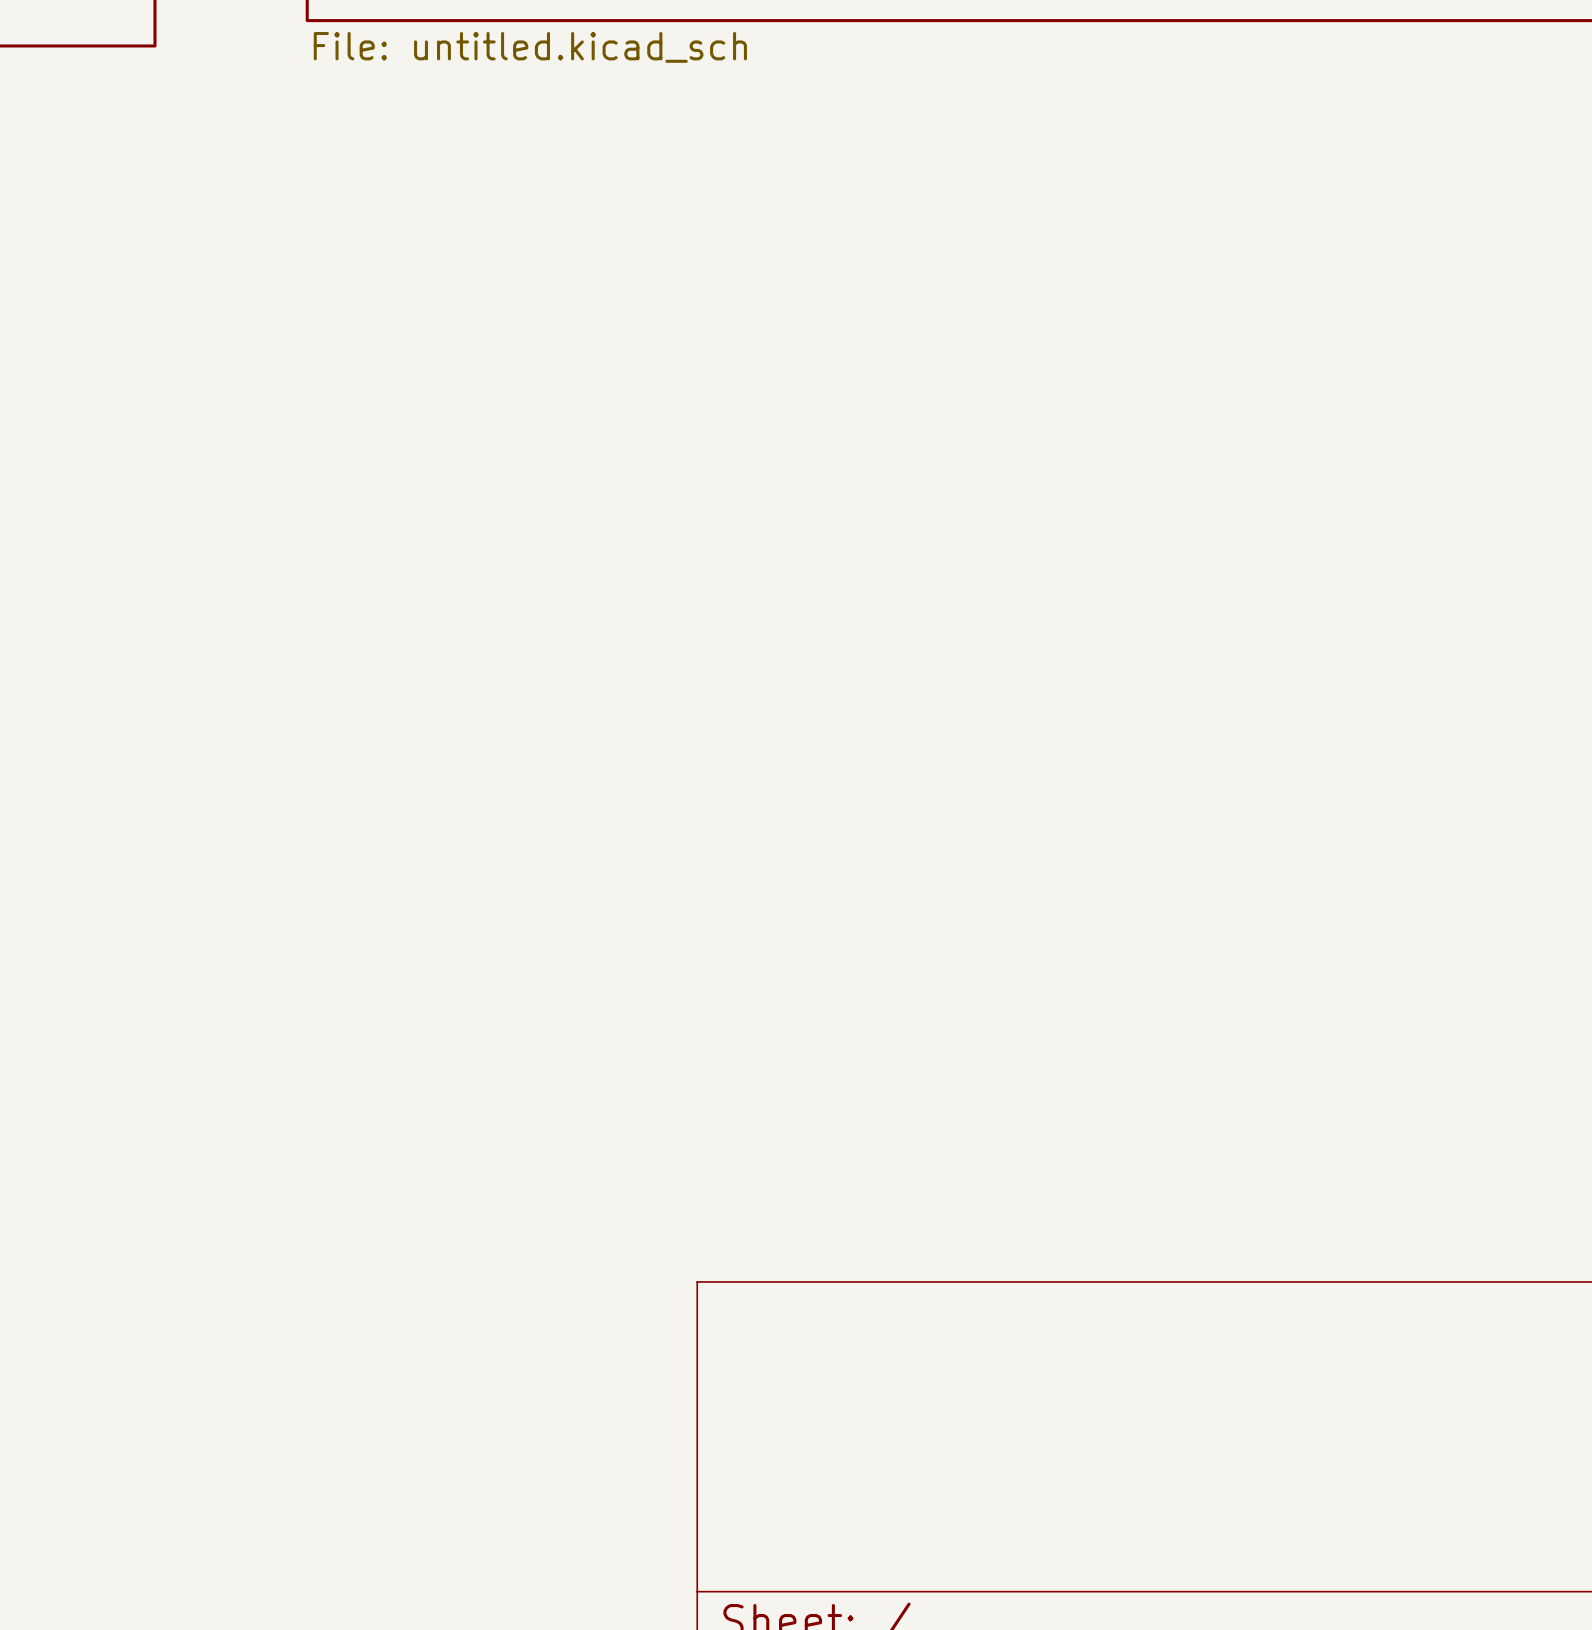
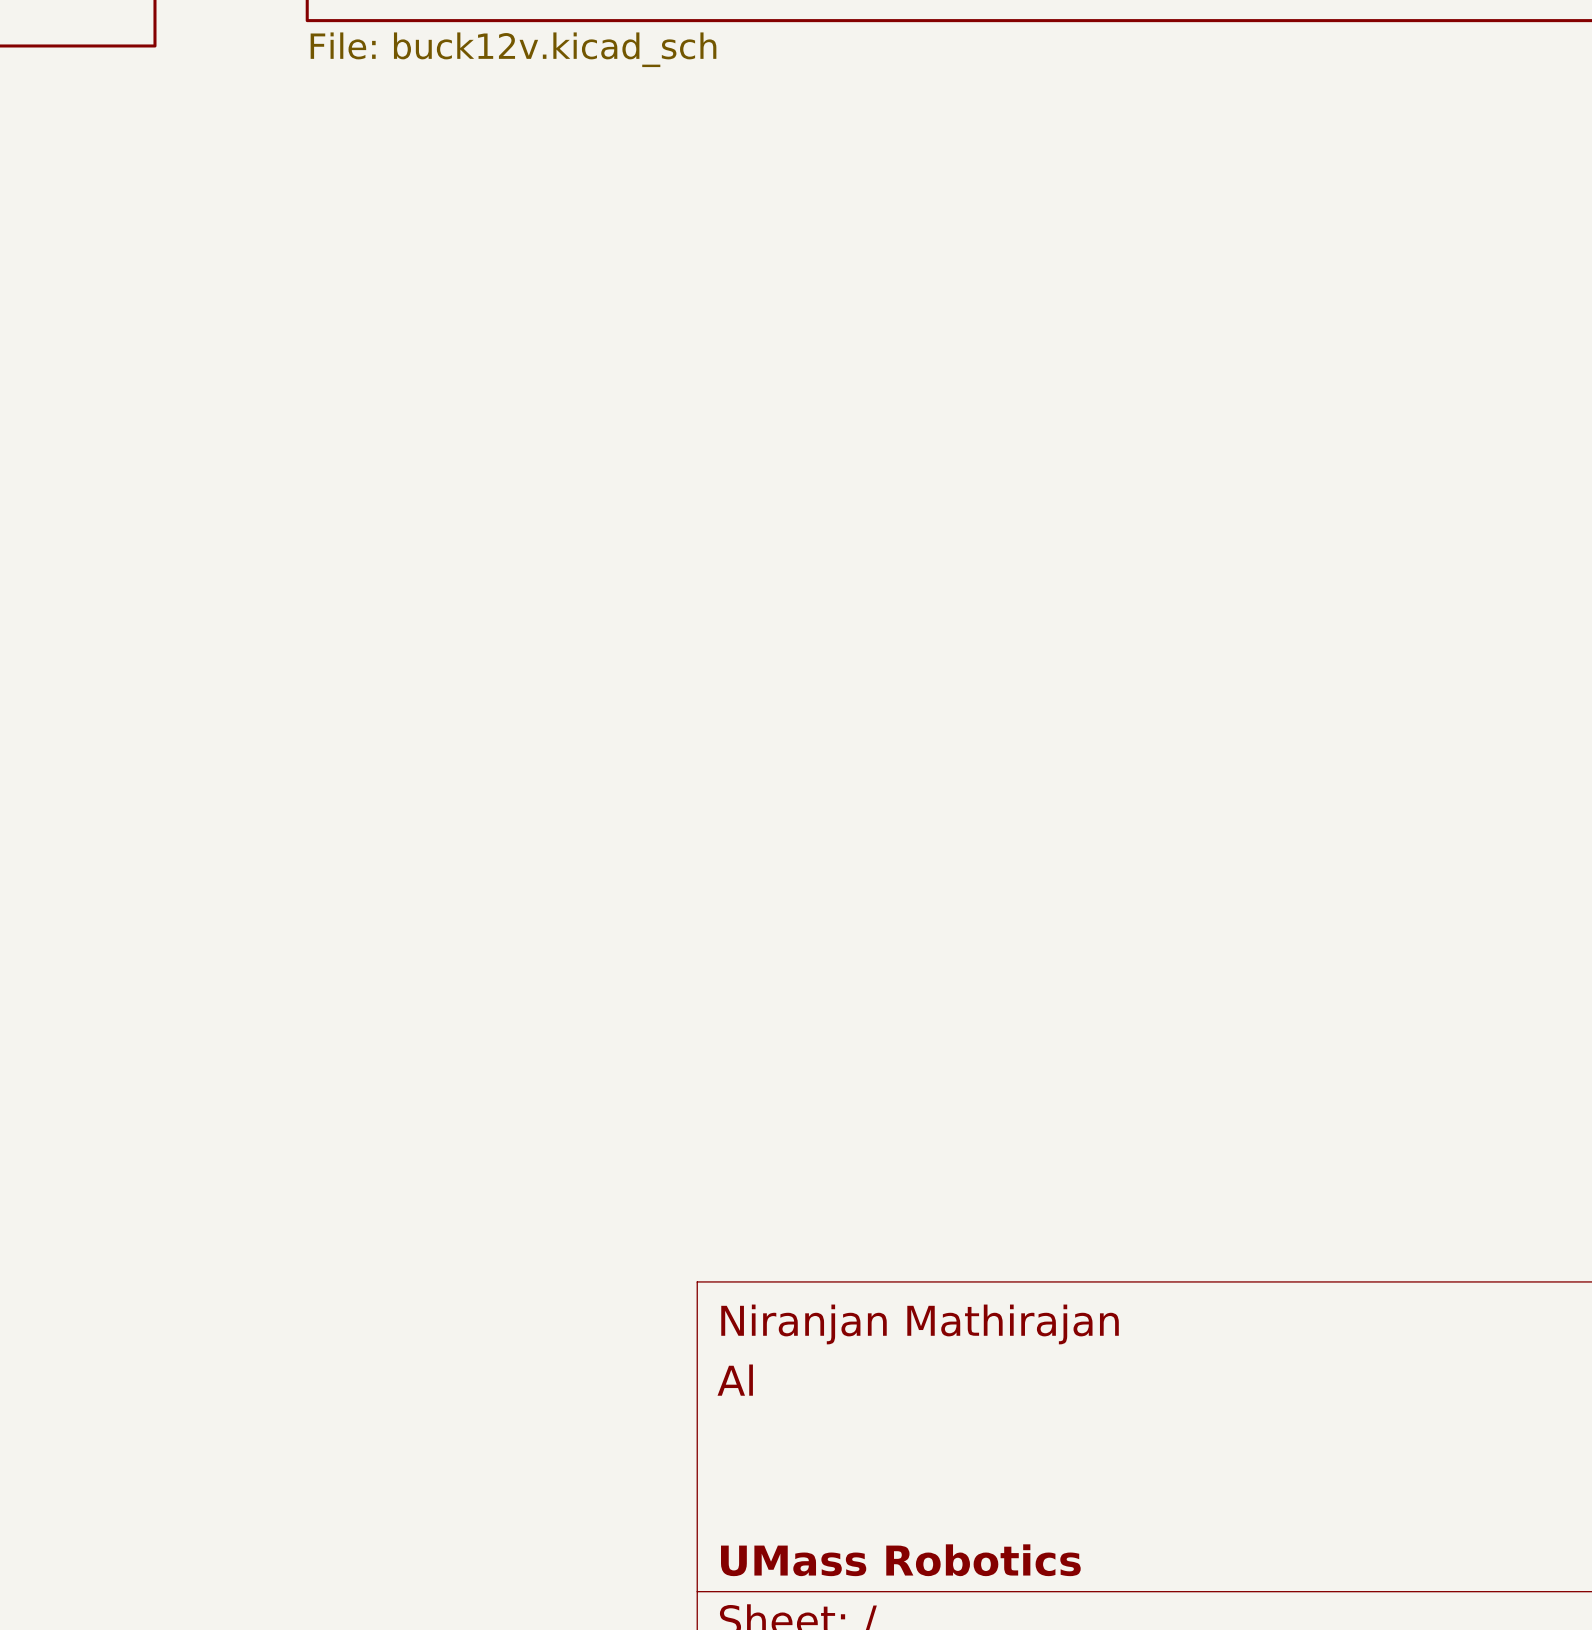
sheet value: File: untitled.kicad_sch (530, 47) -> File: buck12v.kicad_sch (513, 49)
title block: none -> Niranjan Mathirajan (920, 1324)
title block: none -> Al (735, 1380)
title block: none -> UMass Robotics (900, 1560)

